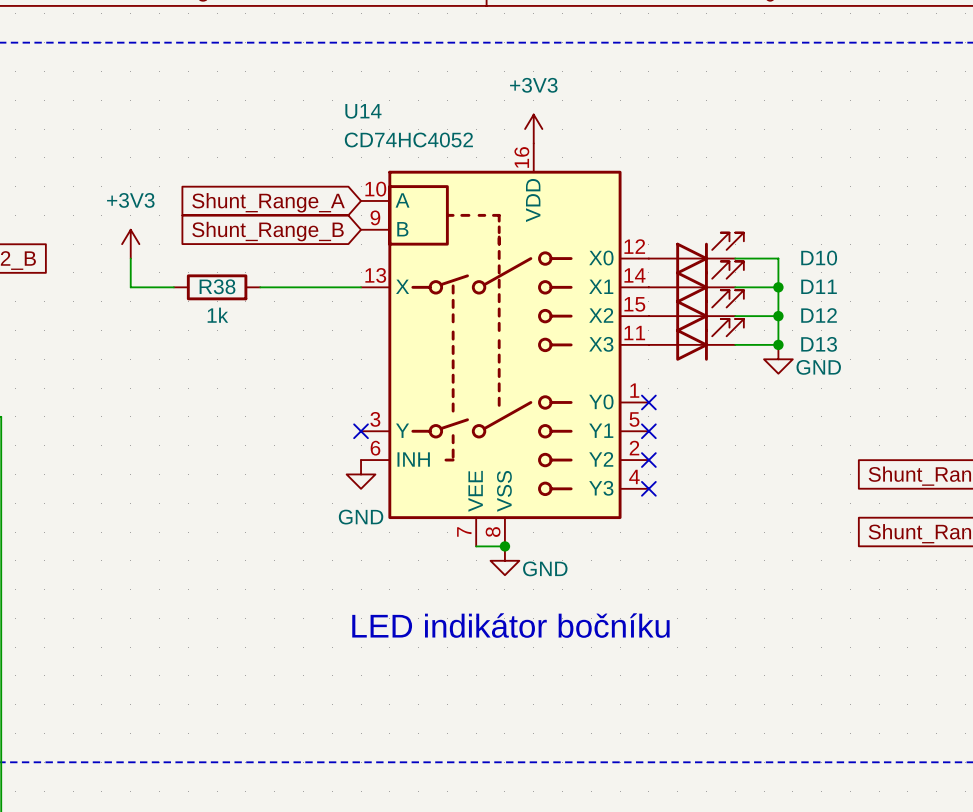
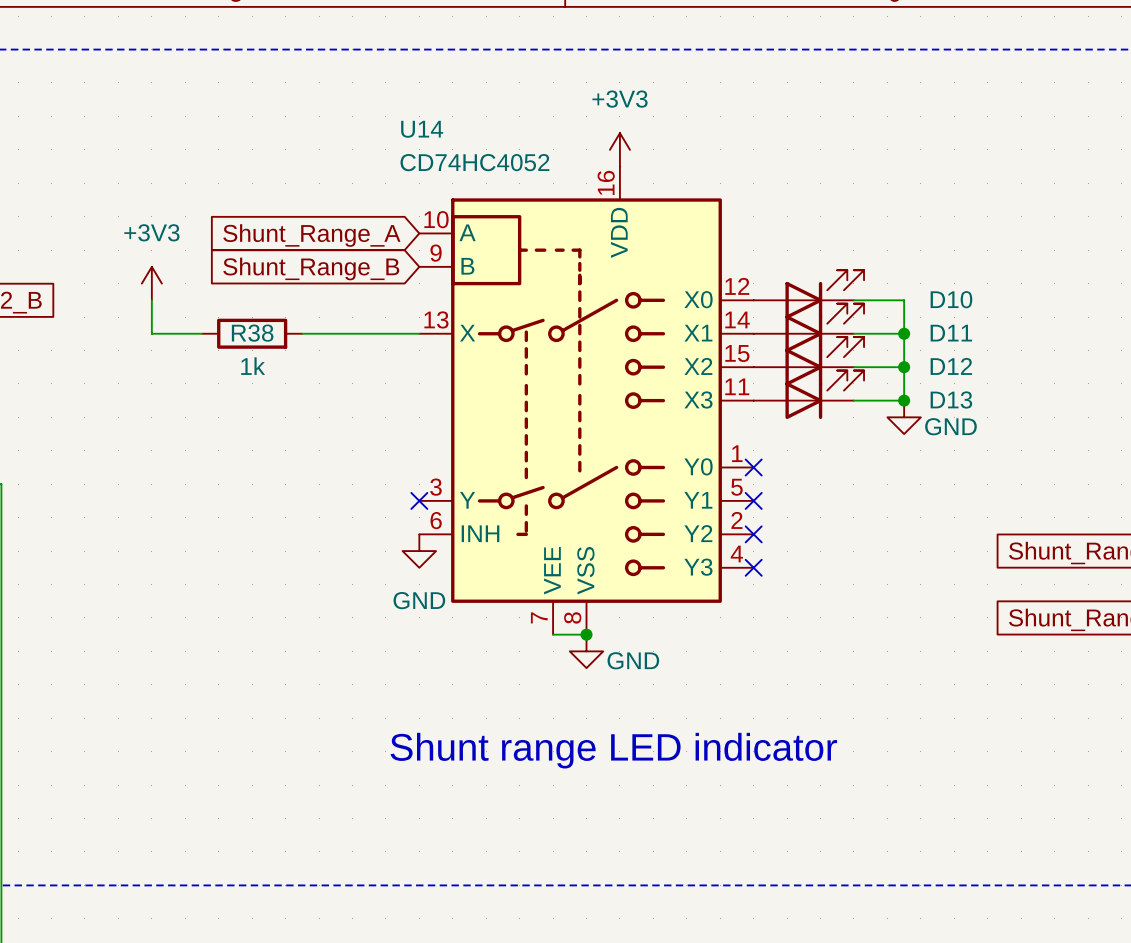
text: LED indikátor bočníku (510, 625) -> none
text: none -> Shunt range LED indicator (613, 750)

